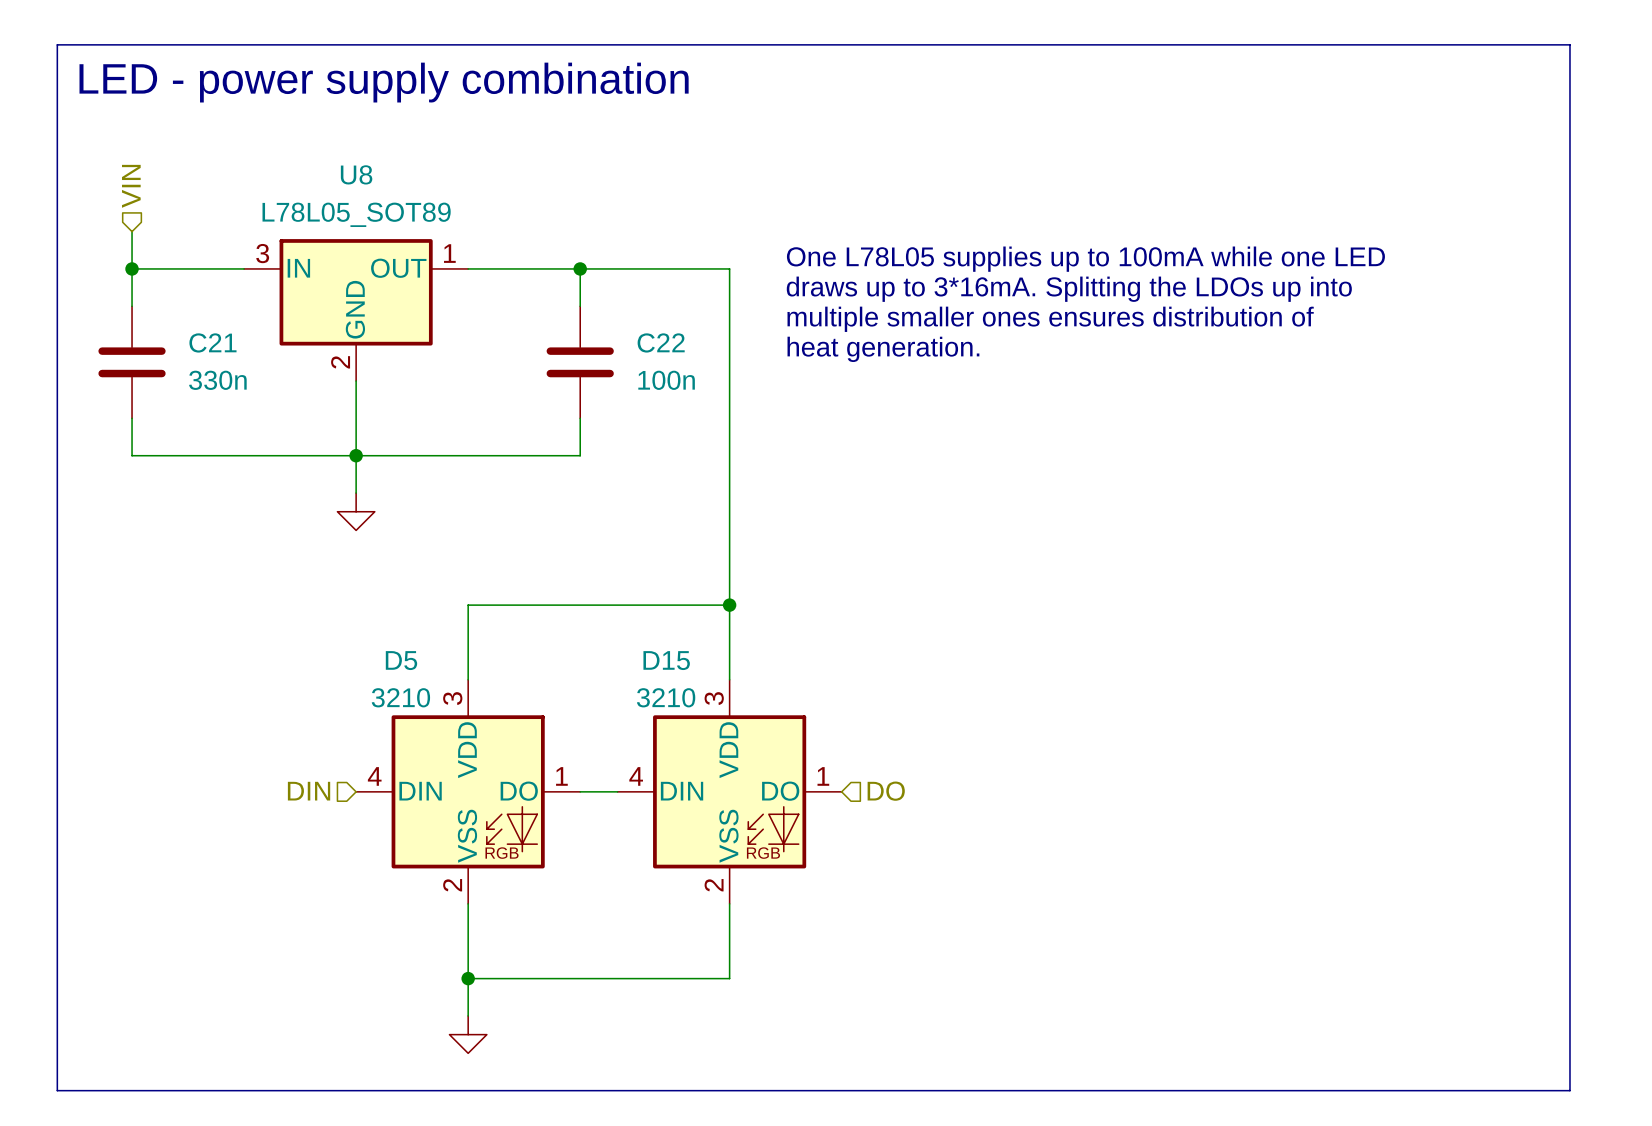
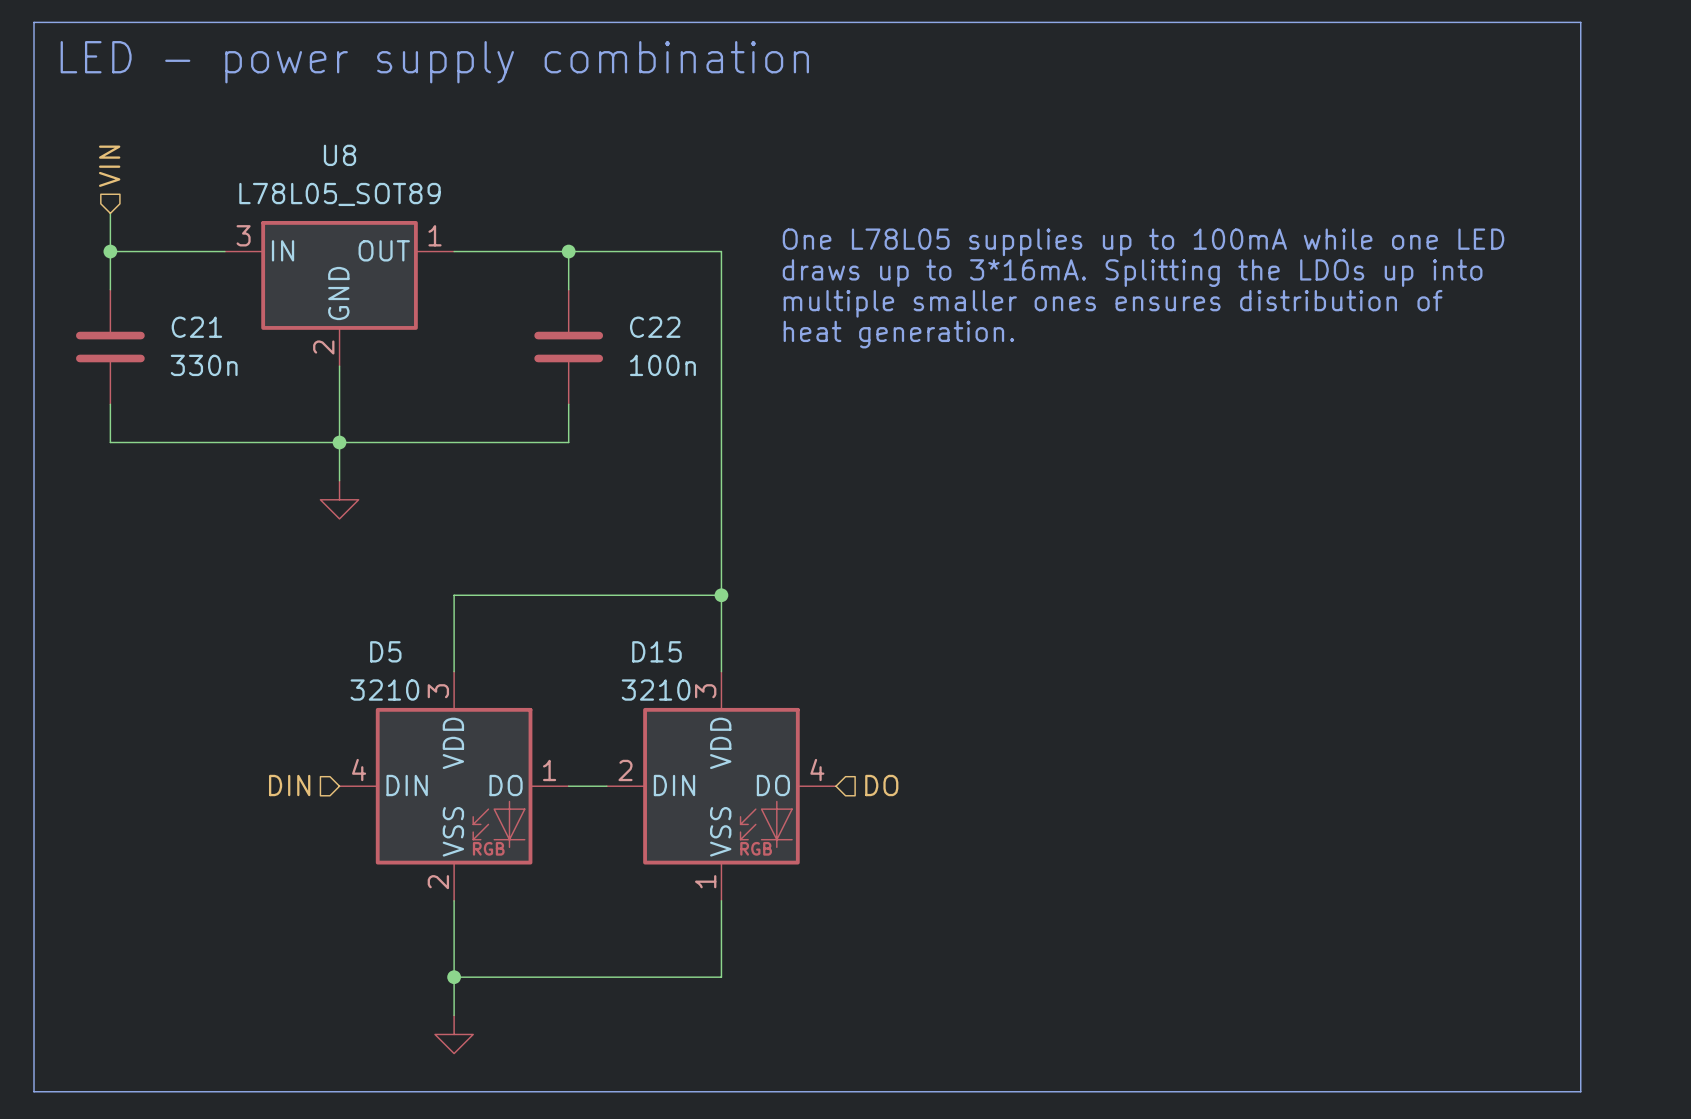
D15 pin number: 4 (636, 776) -> 2 (625, 770)
D15 pin number: 1 (823, 776) -> 4 (817, 770)
D15 pin number: 2 (714, 885) -> 1 (705, 881)

